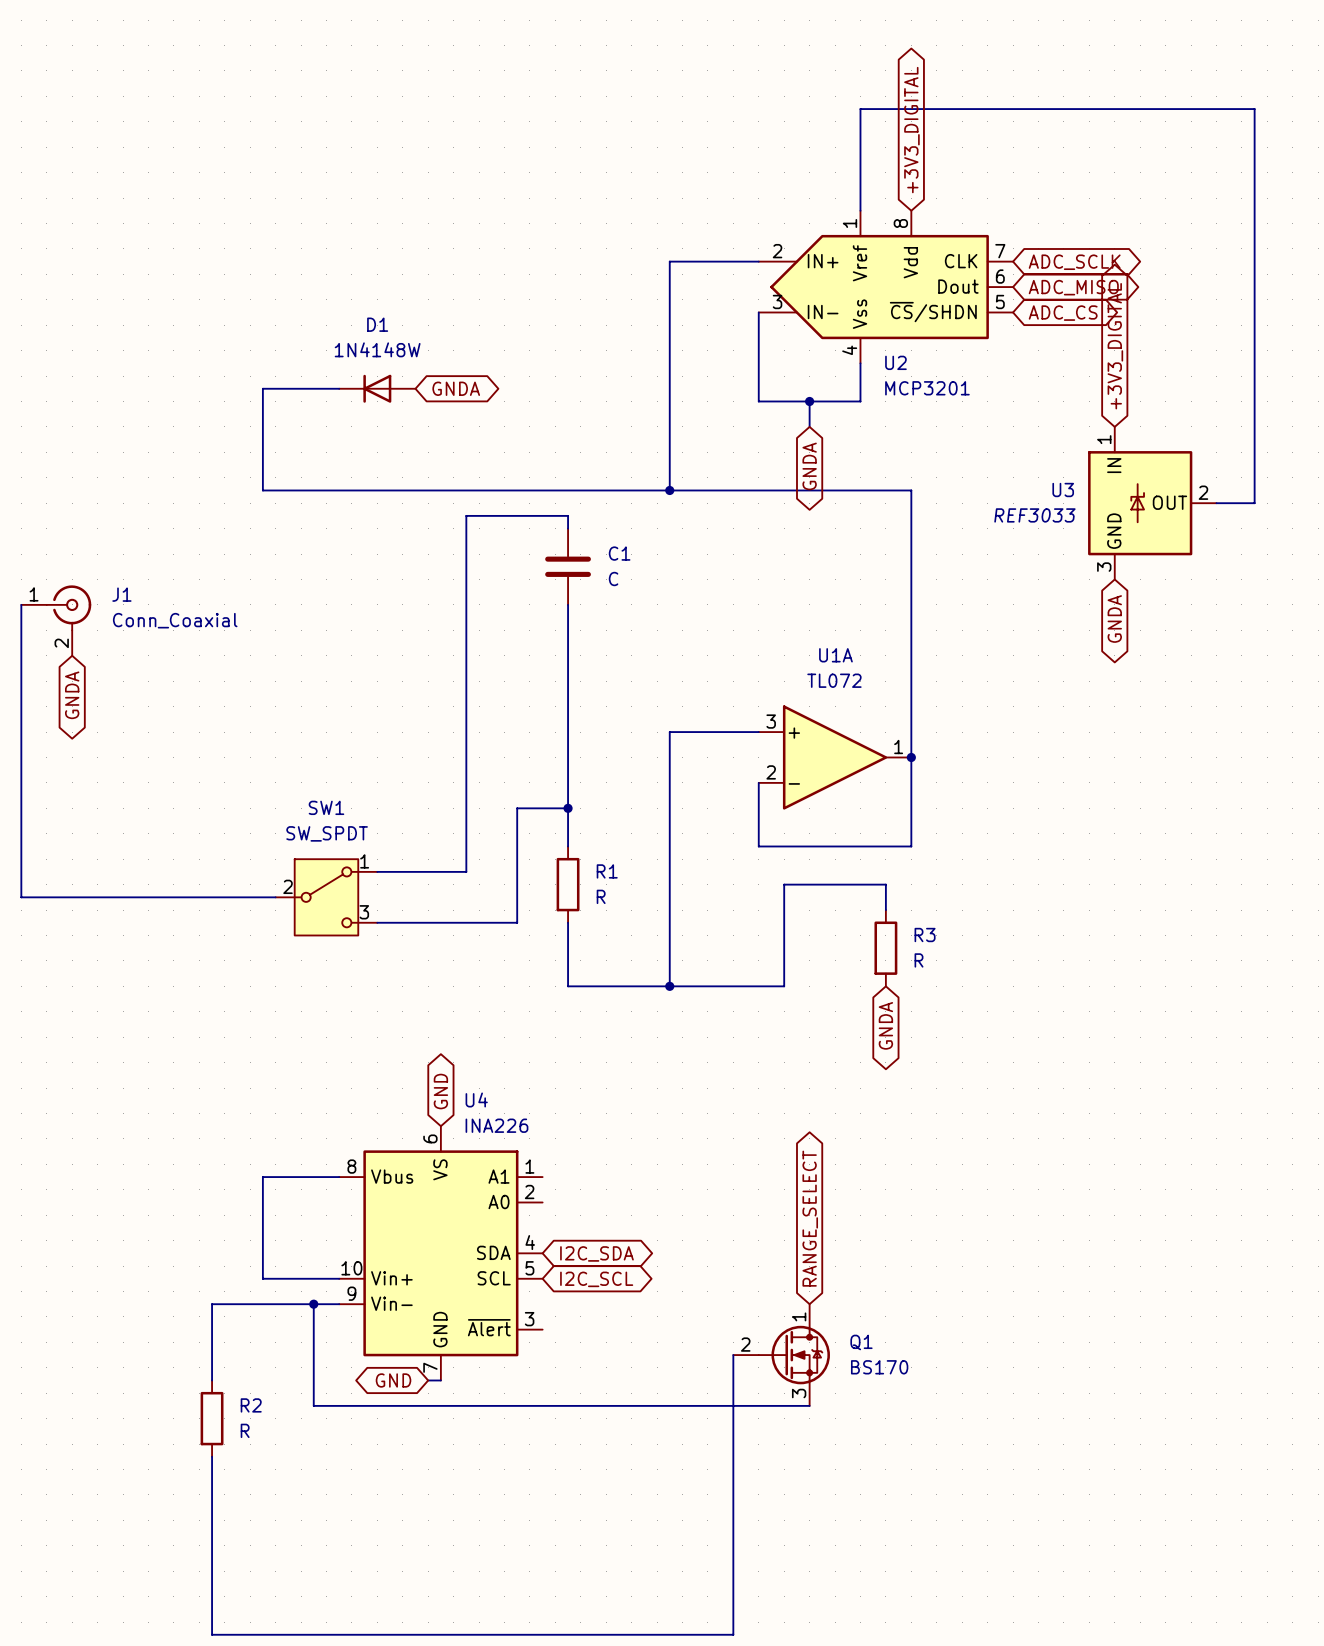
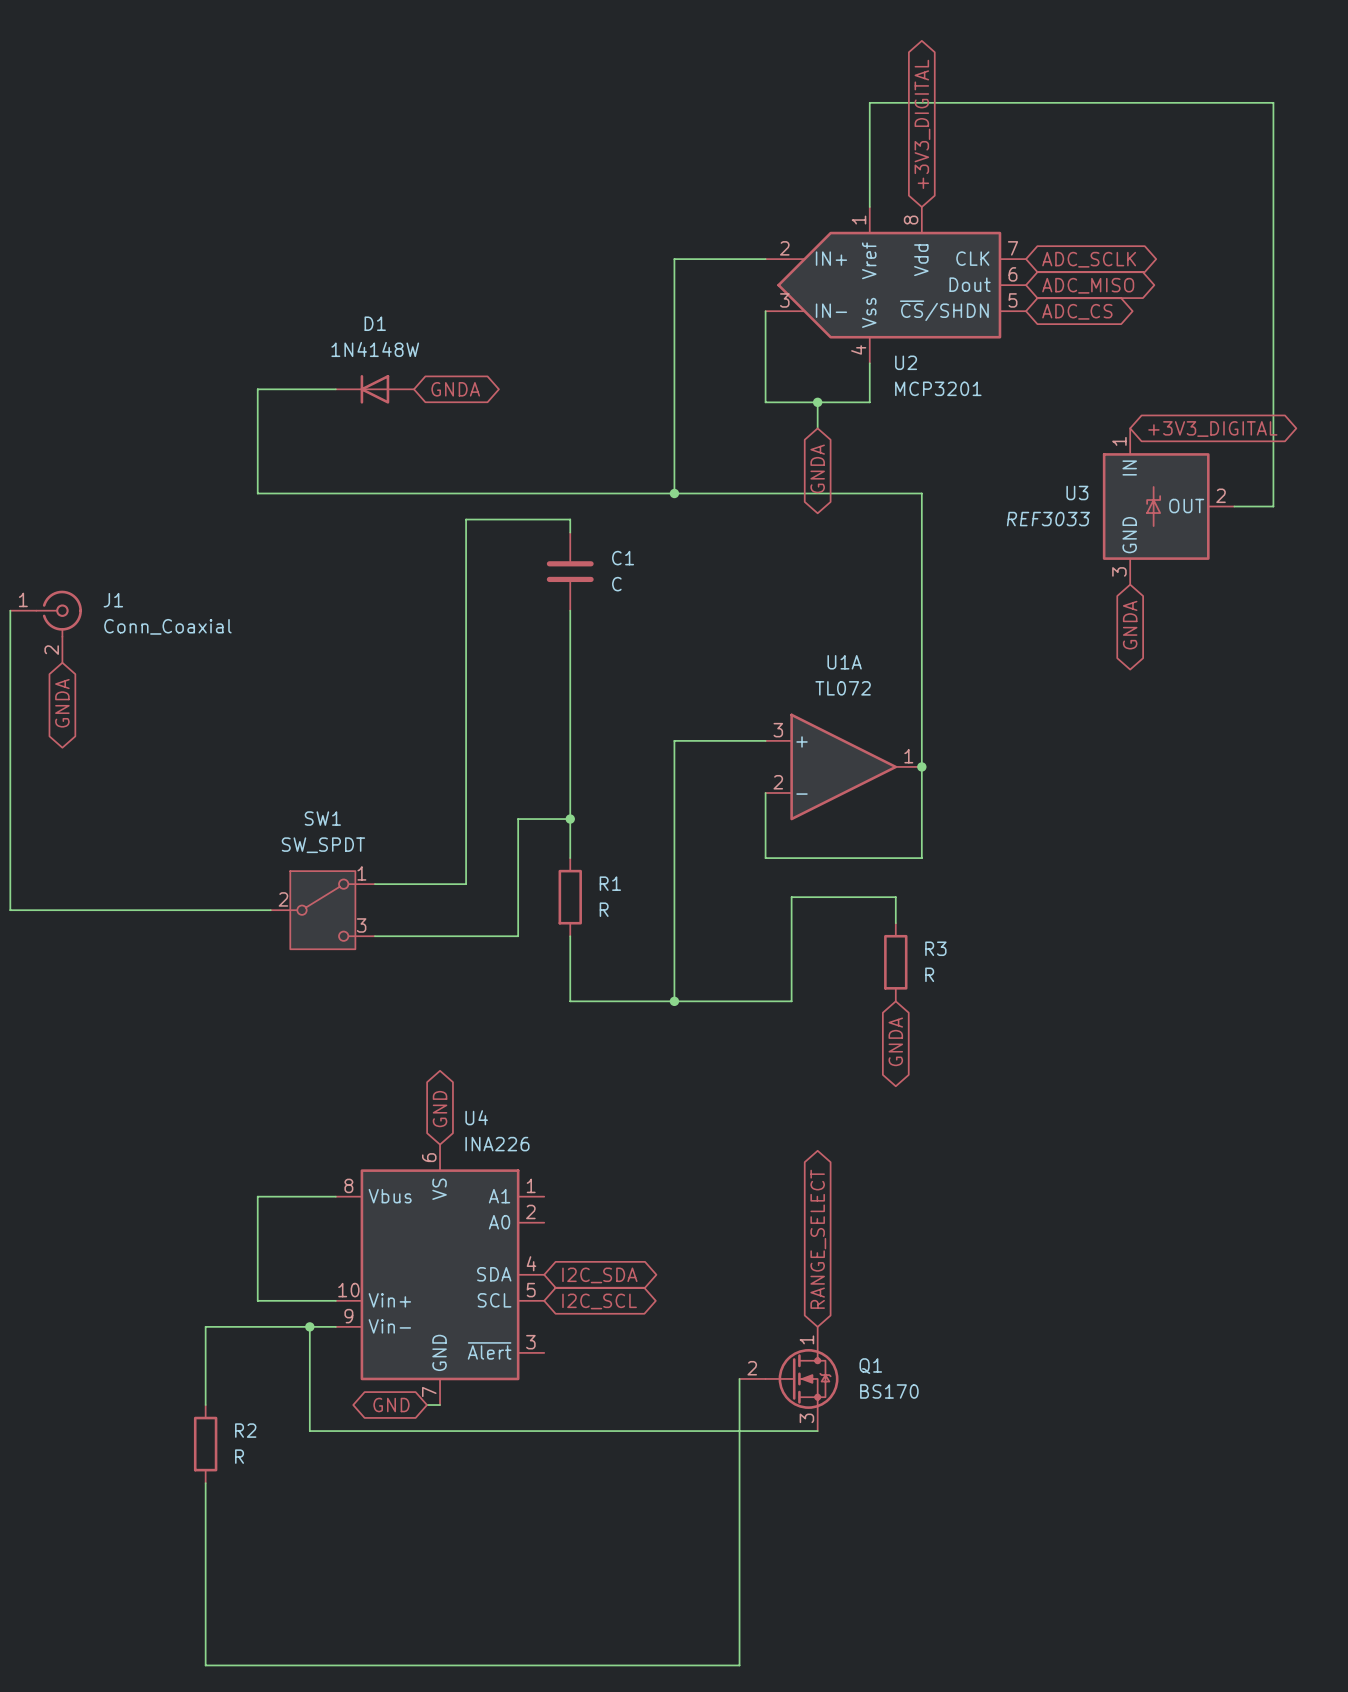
global label rotation: 0° (1115, 346) -> 90° clockwise (1212, 429)

